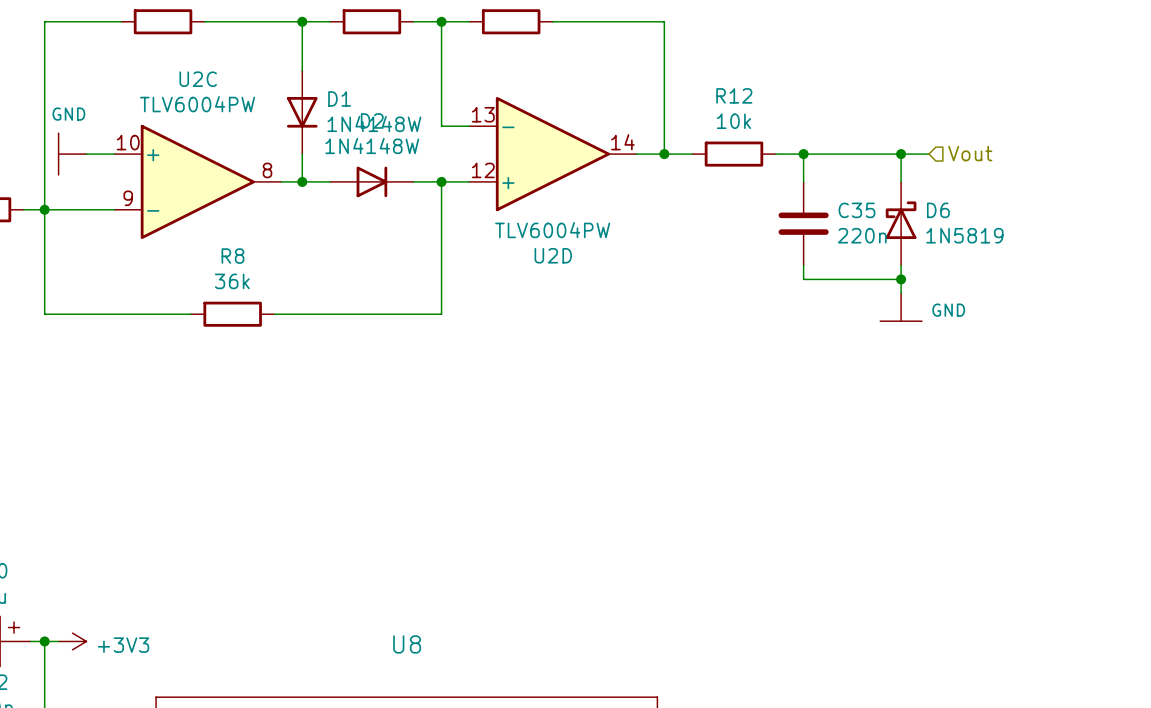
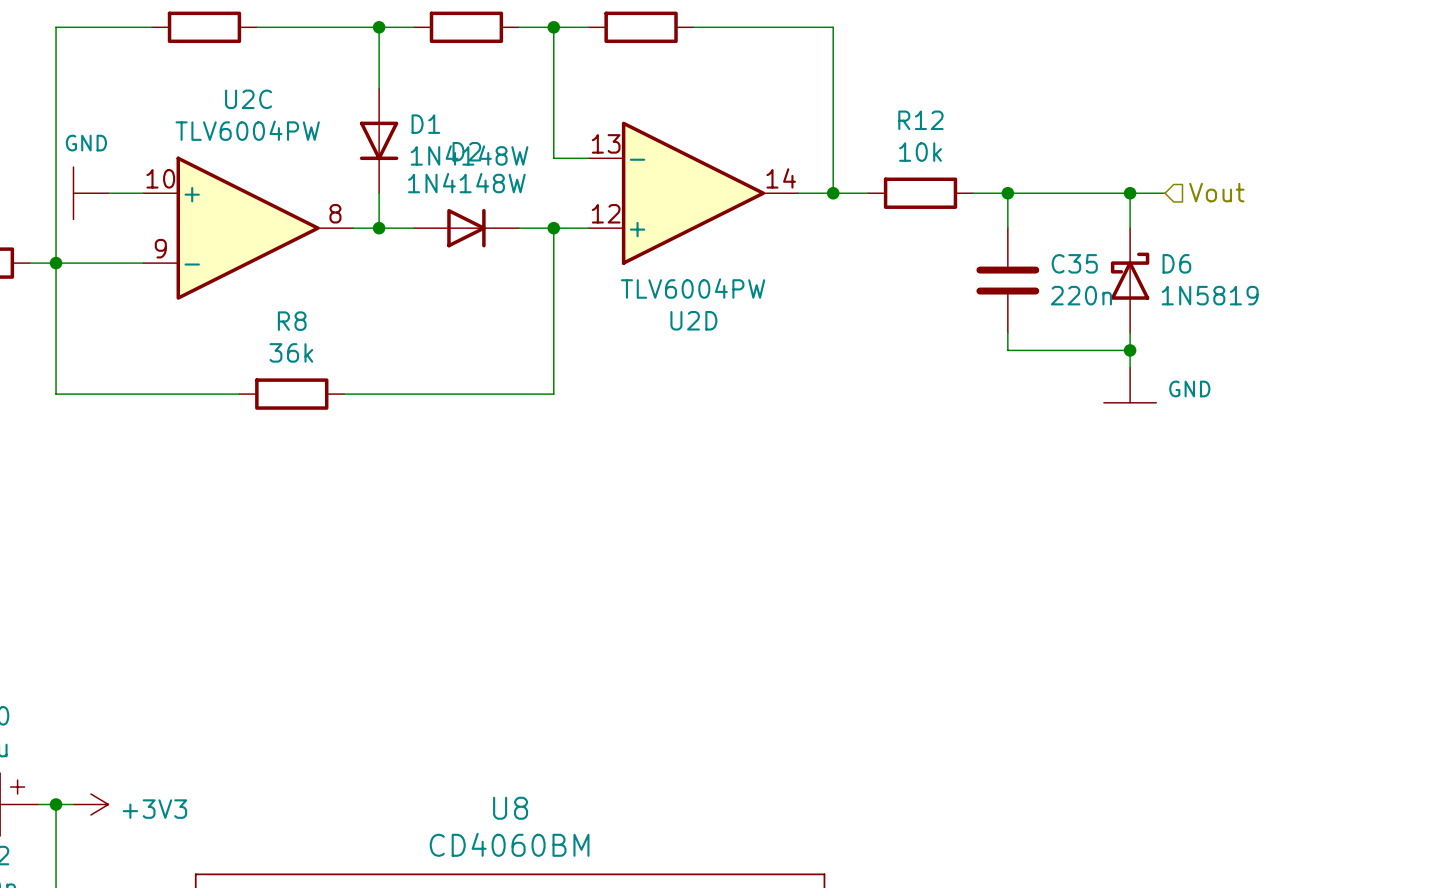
U8 value: none -> CD4060BM (509, 844)

